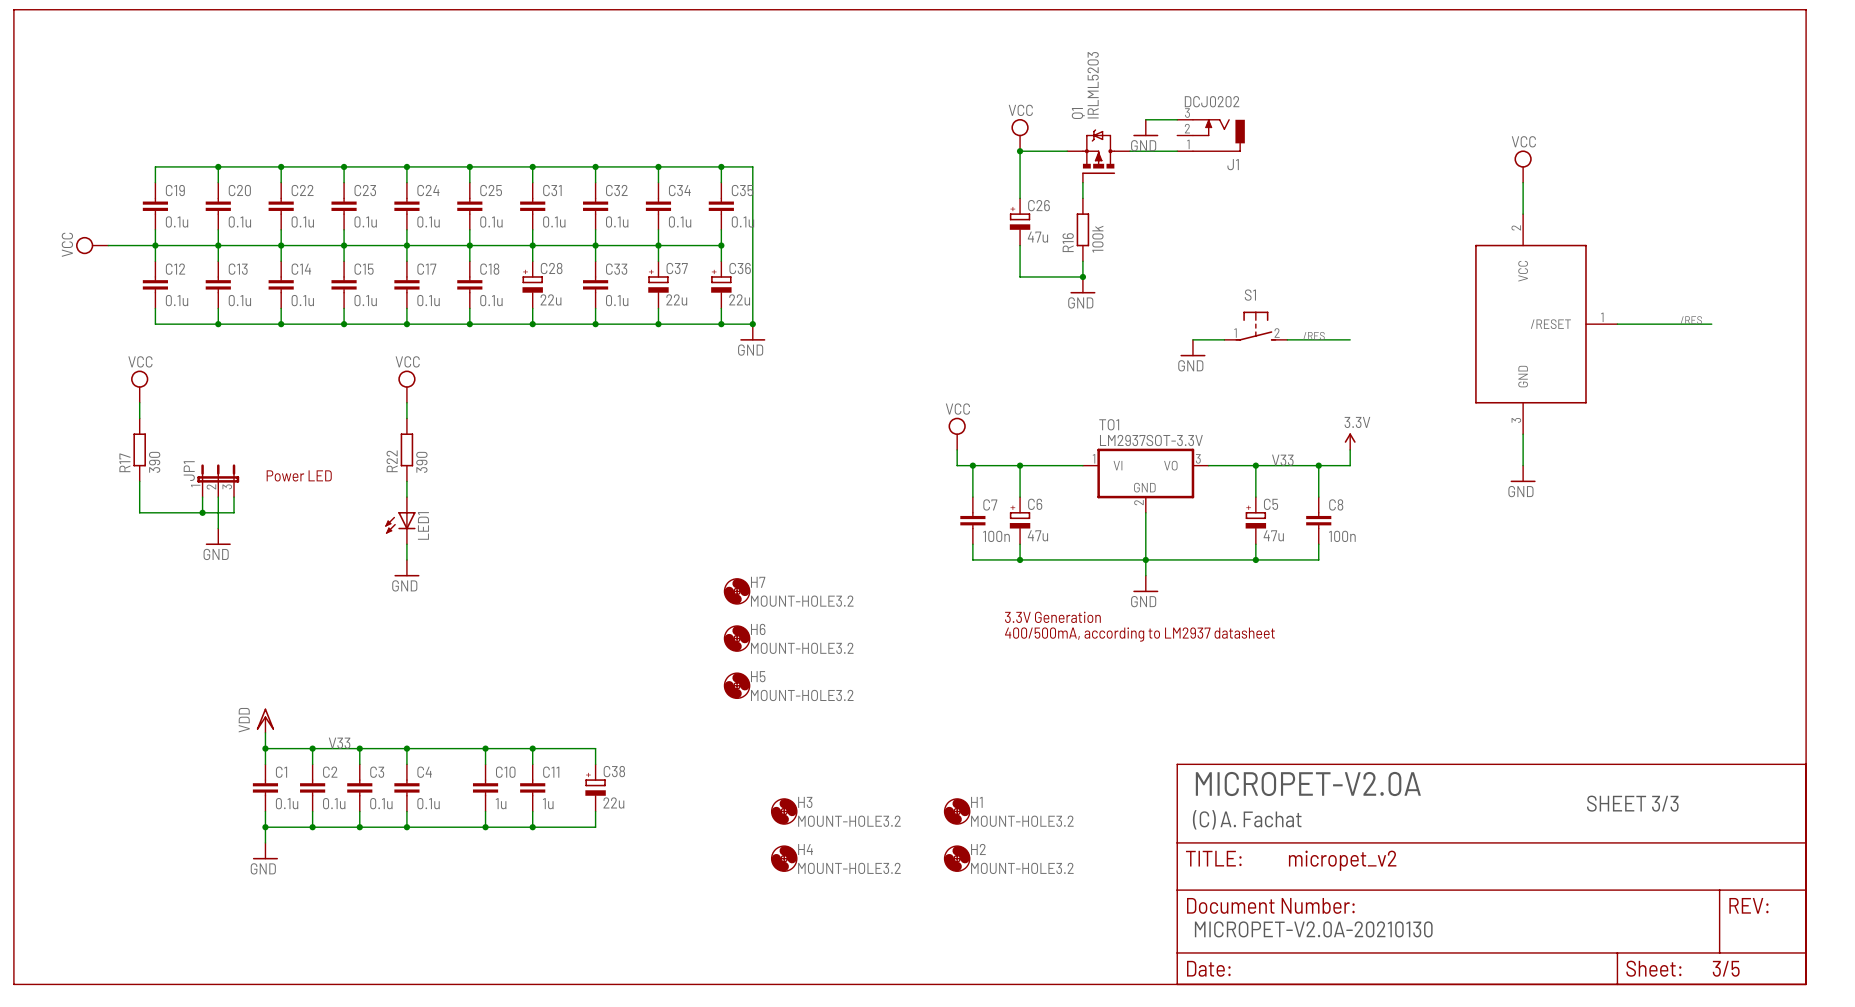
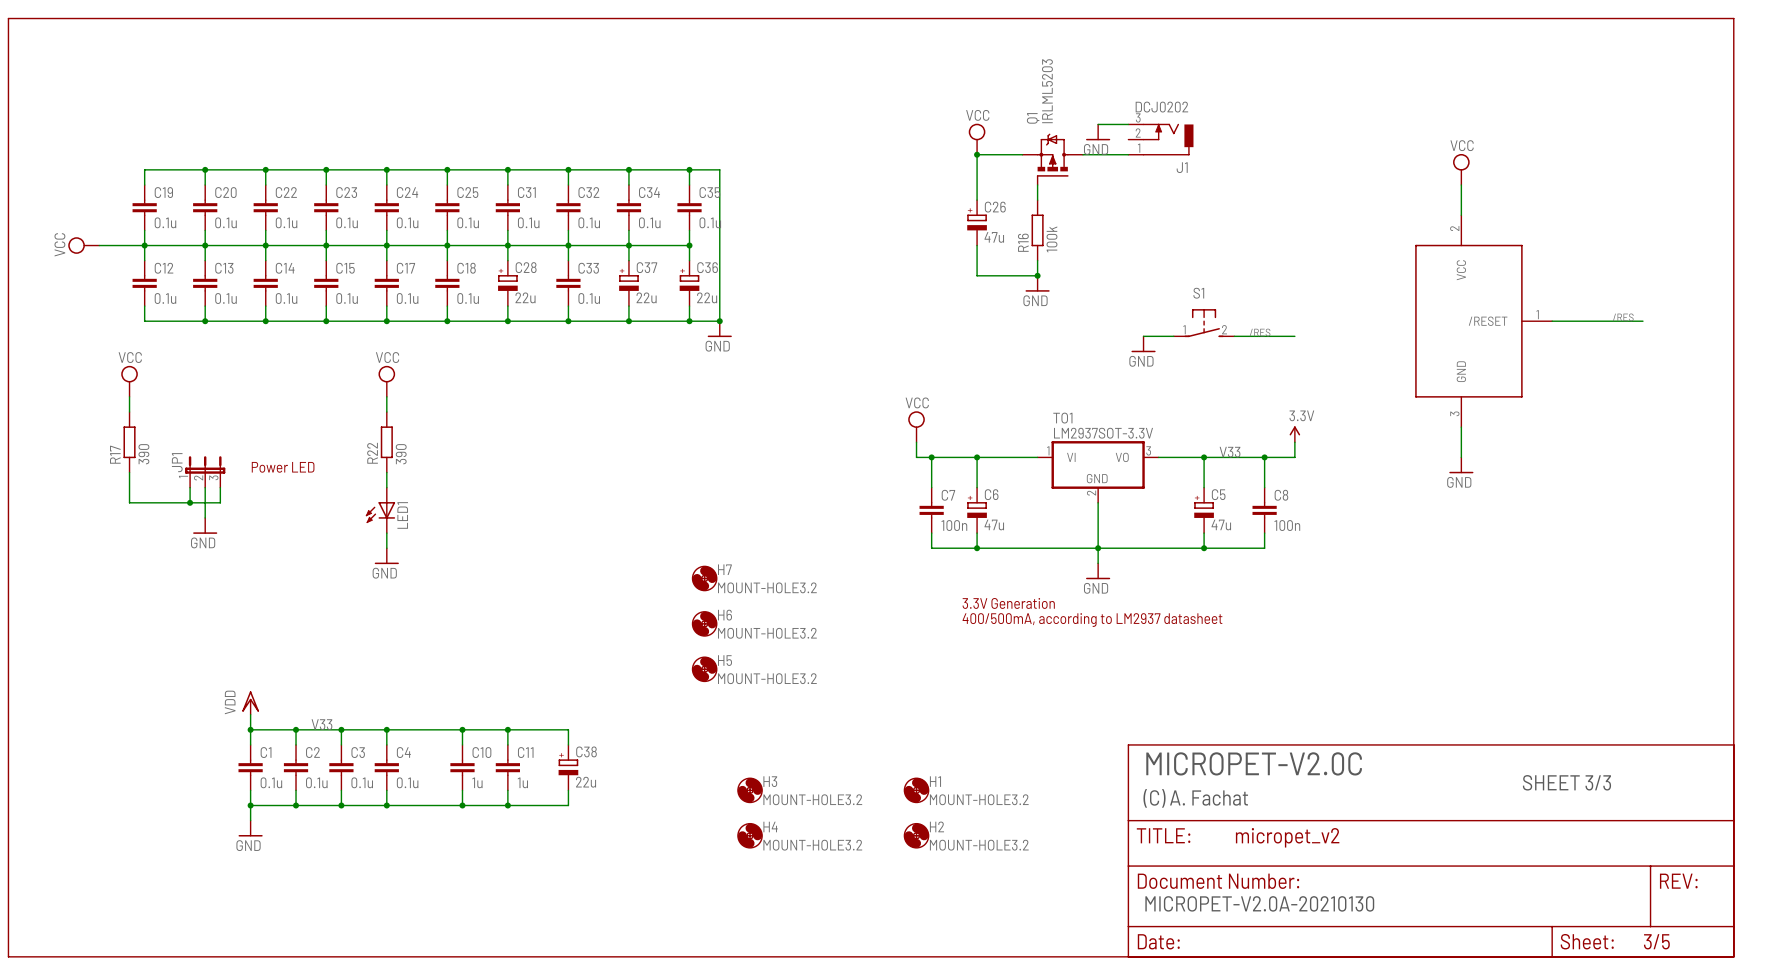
text: MICROPET-V2.0A (1308, 784) -> MICROPET-V2.0C (1254, 763)

